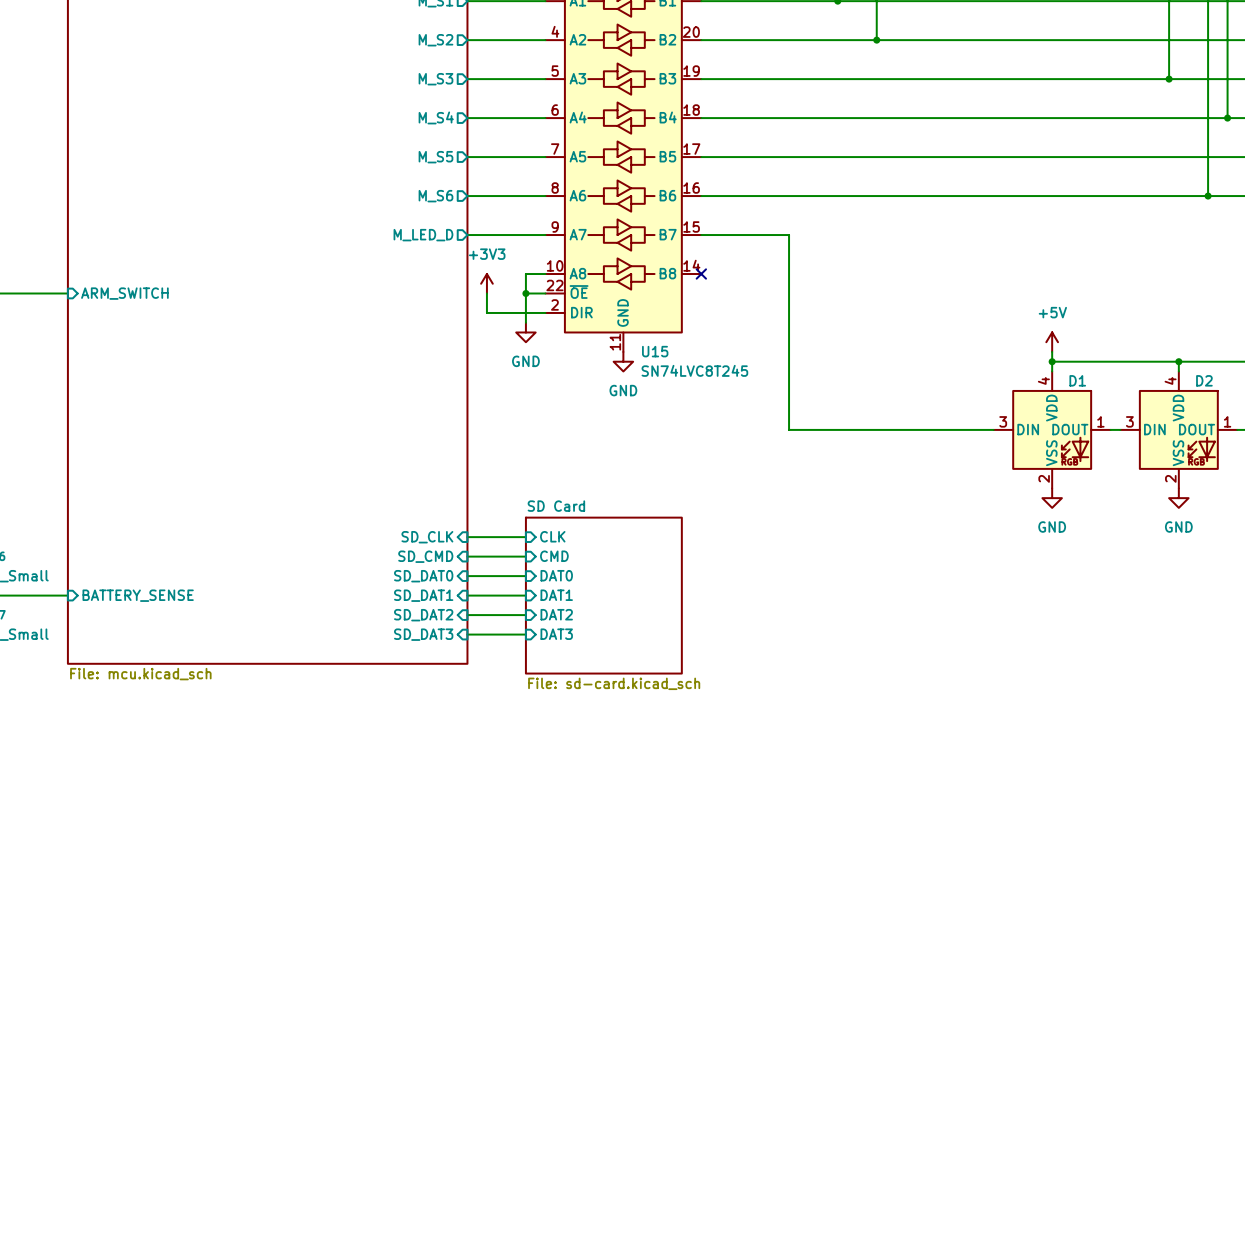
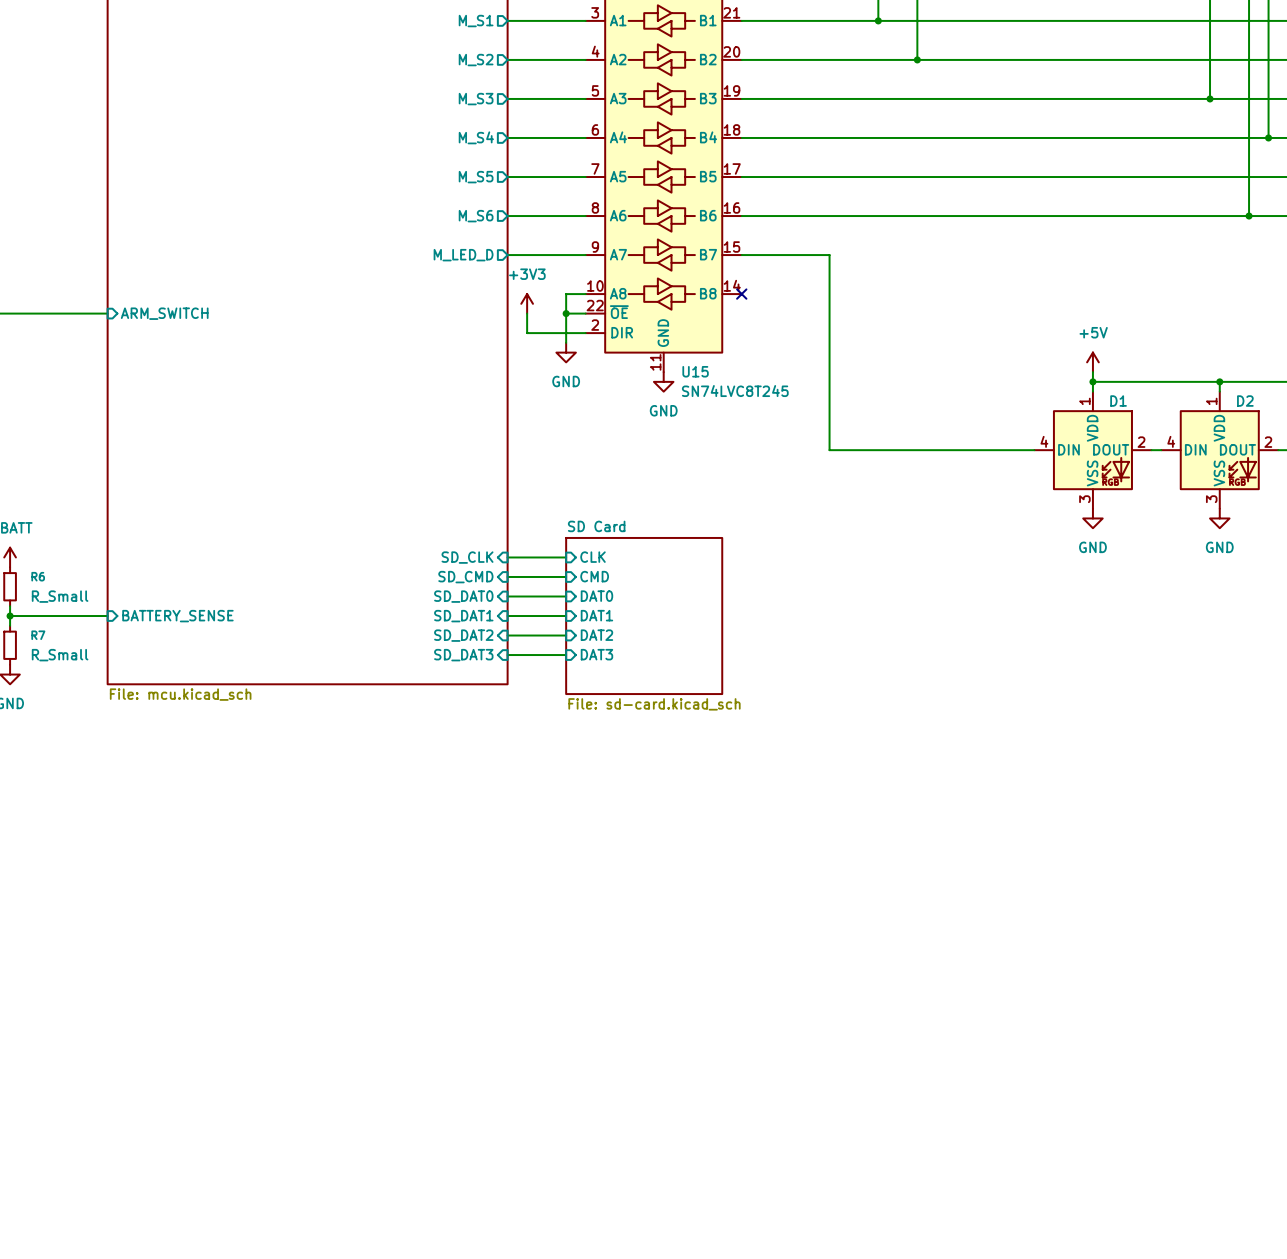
D1 pin number: 4 (1043, 380) -> 1 (1084, 401)
D2 pin number: 4 (1170, 380) -> 1 (1211, 401)
D1 pin number: 3 (1003, 421) -> 4 (1044, 441)
D1 pin number: 1 (1100, 421) -> 2 (1141, 442)
D2 pin number: 3 (1129, 421) -> 4 (1171, 441)
D2 pin number: 1 (1227, 421) -> 2 (1268, 442)
D1 pin number: 2 (1044, 478) -> 3 (1084, 499)
D2 pin number: 2 (1170, 478) -> 3 (1211, 499)

